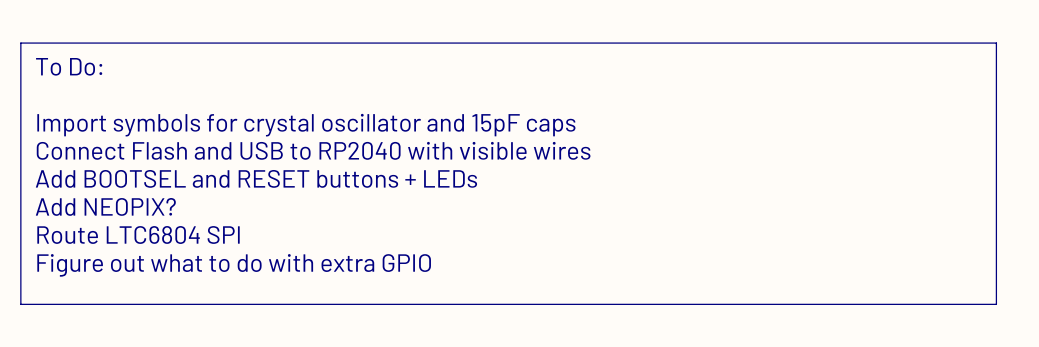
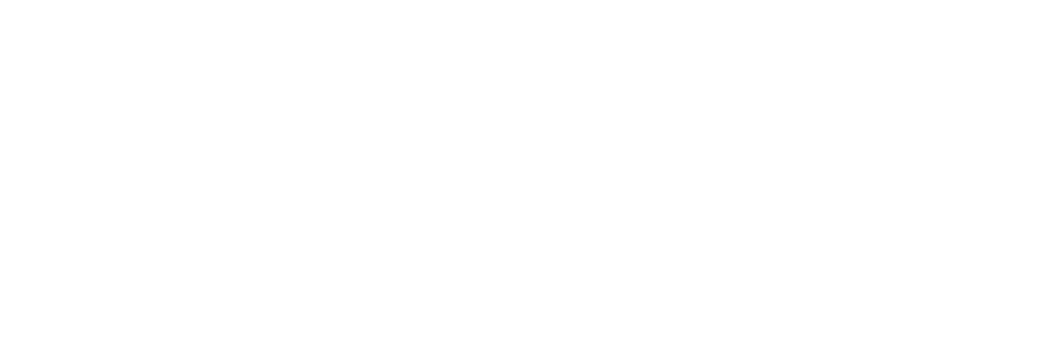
line: (20, 43) (996, 43) (996, 304) (20, 304) (20, 43) -> none
text: To Do: (69, 66) -> none
text: Import symbols for crystal oscillator and 15pF caps (306, 125) -> none
text: Connect Flash and USB to RP2040 with visible wires (313, 150) -> none
text: Add BOOTSEL and RESET buttons + LEDs (256, 178) -> none
text: Add NEOPIX? (105, 206) -> none
text: Route LTC6804 SPI (138, 234) -> none
text: Figure out what to do with extra GPIO (234, 265) -> none

